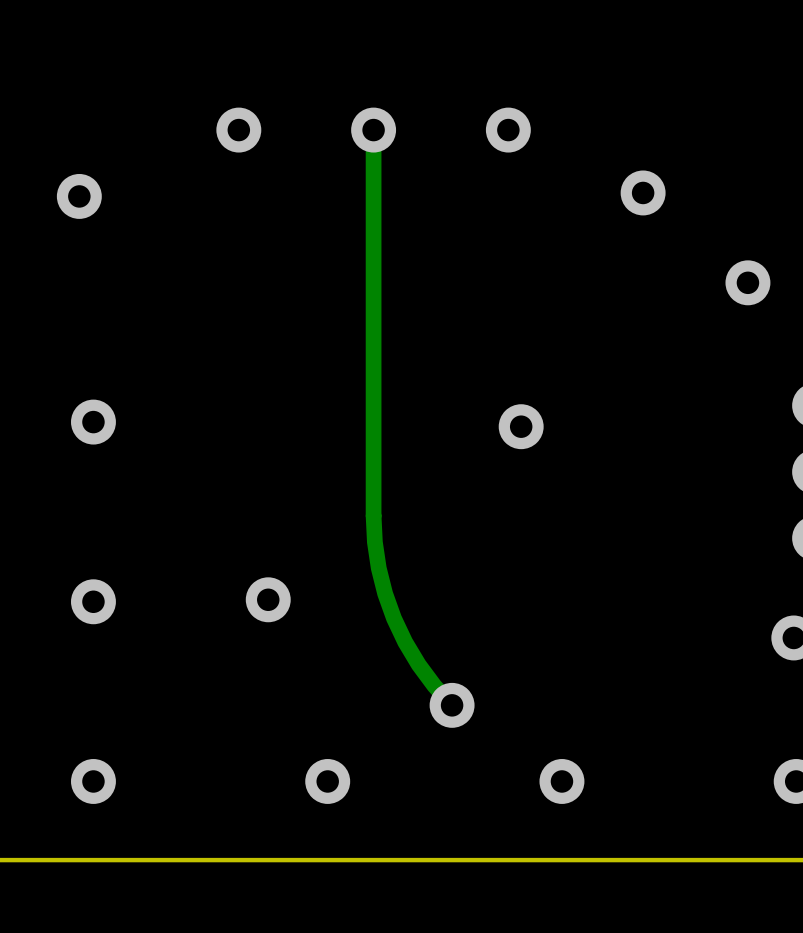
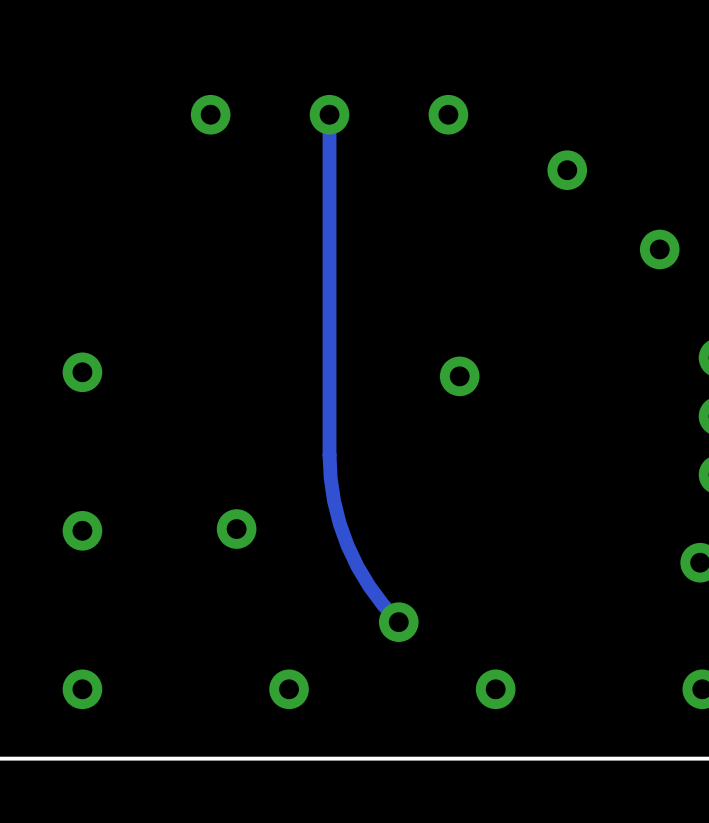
via: (79, 196) -> none

